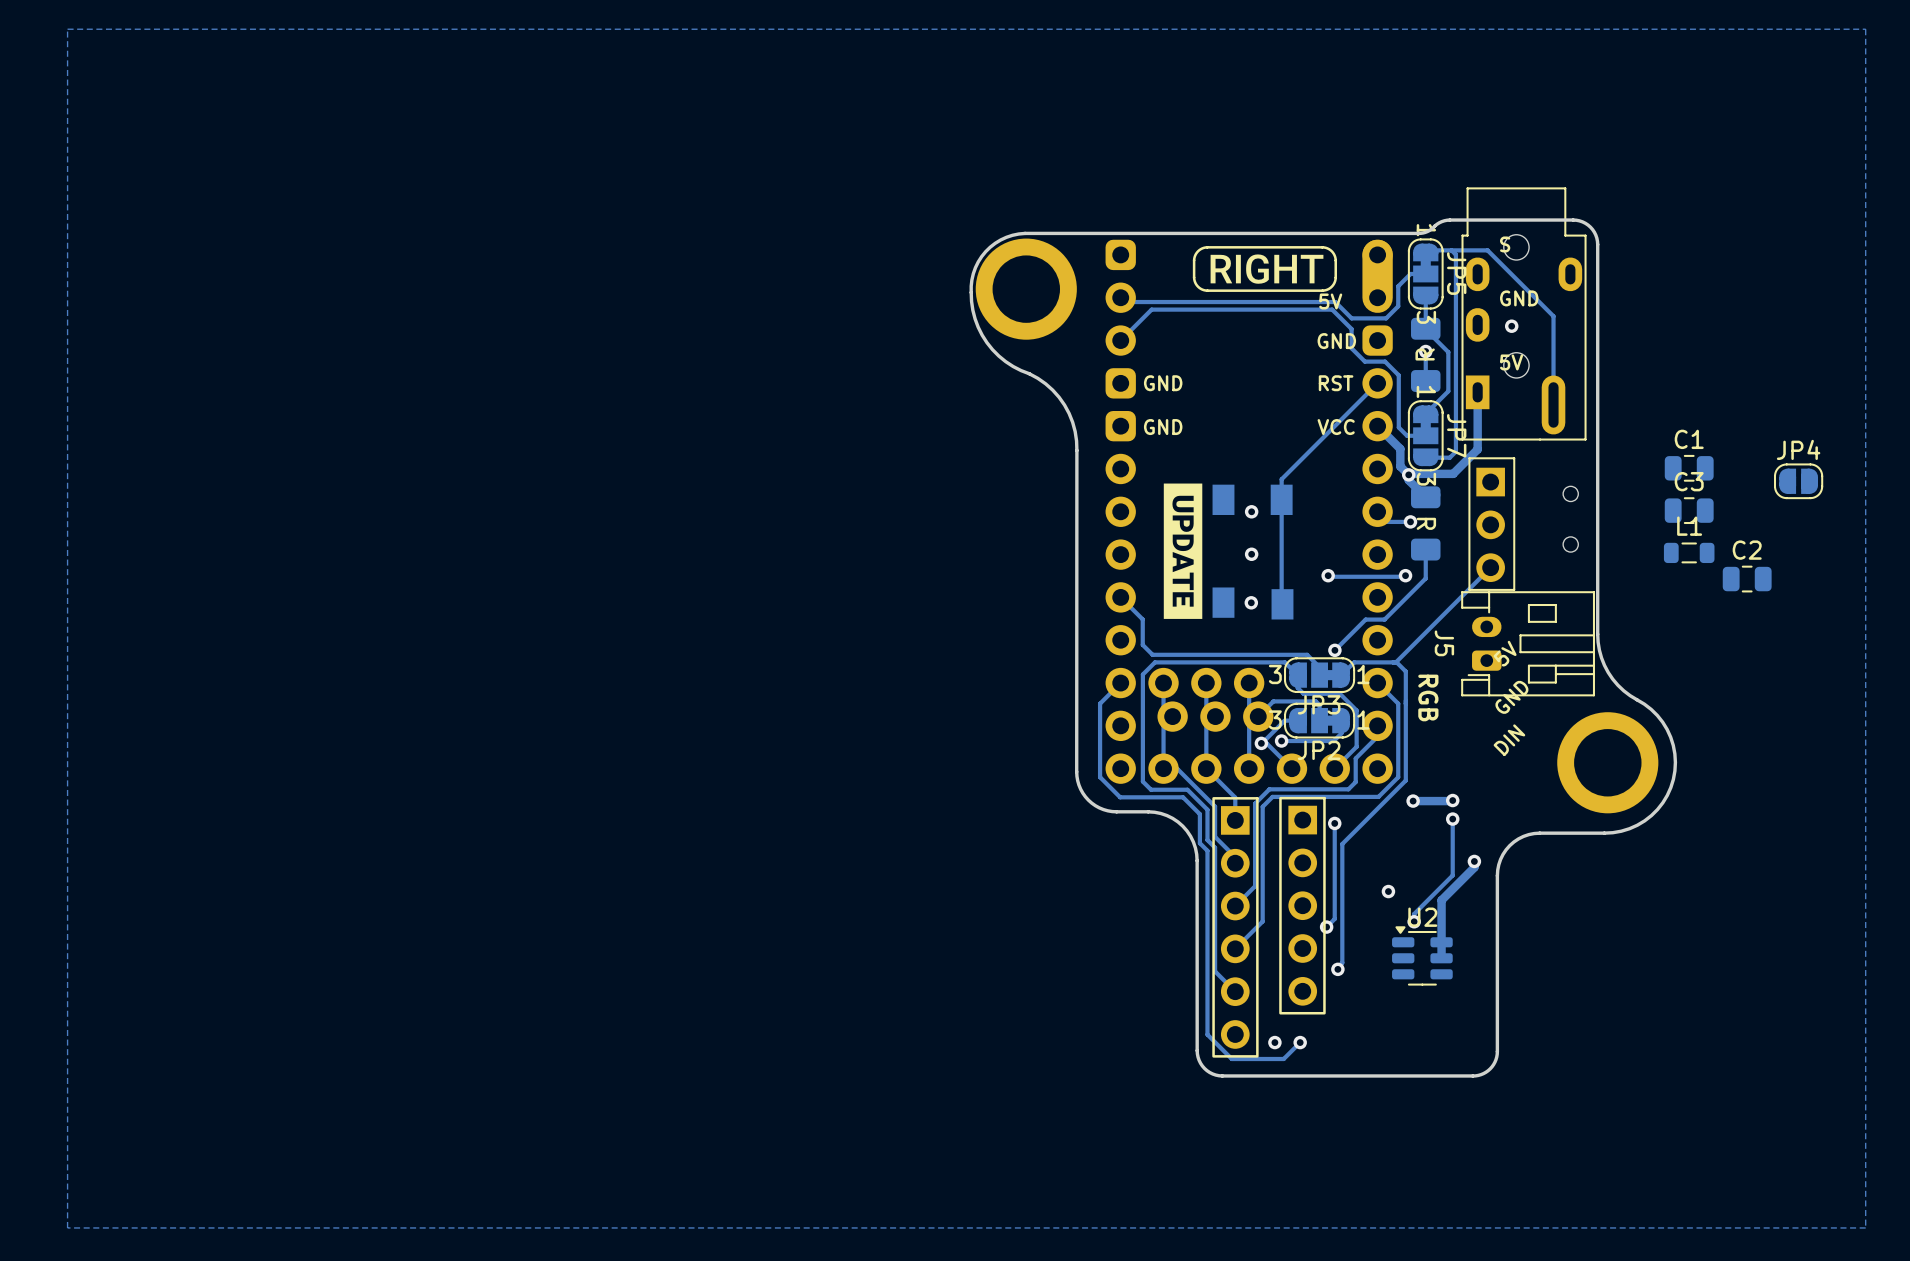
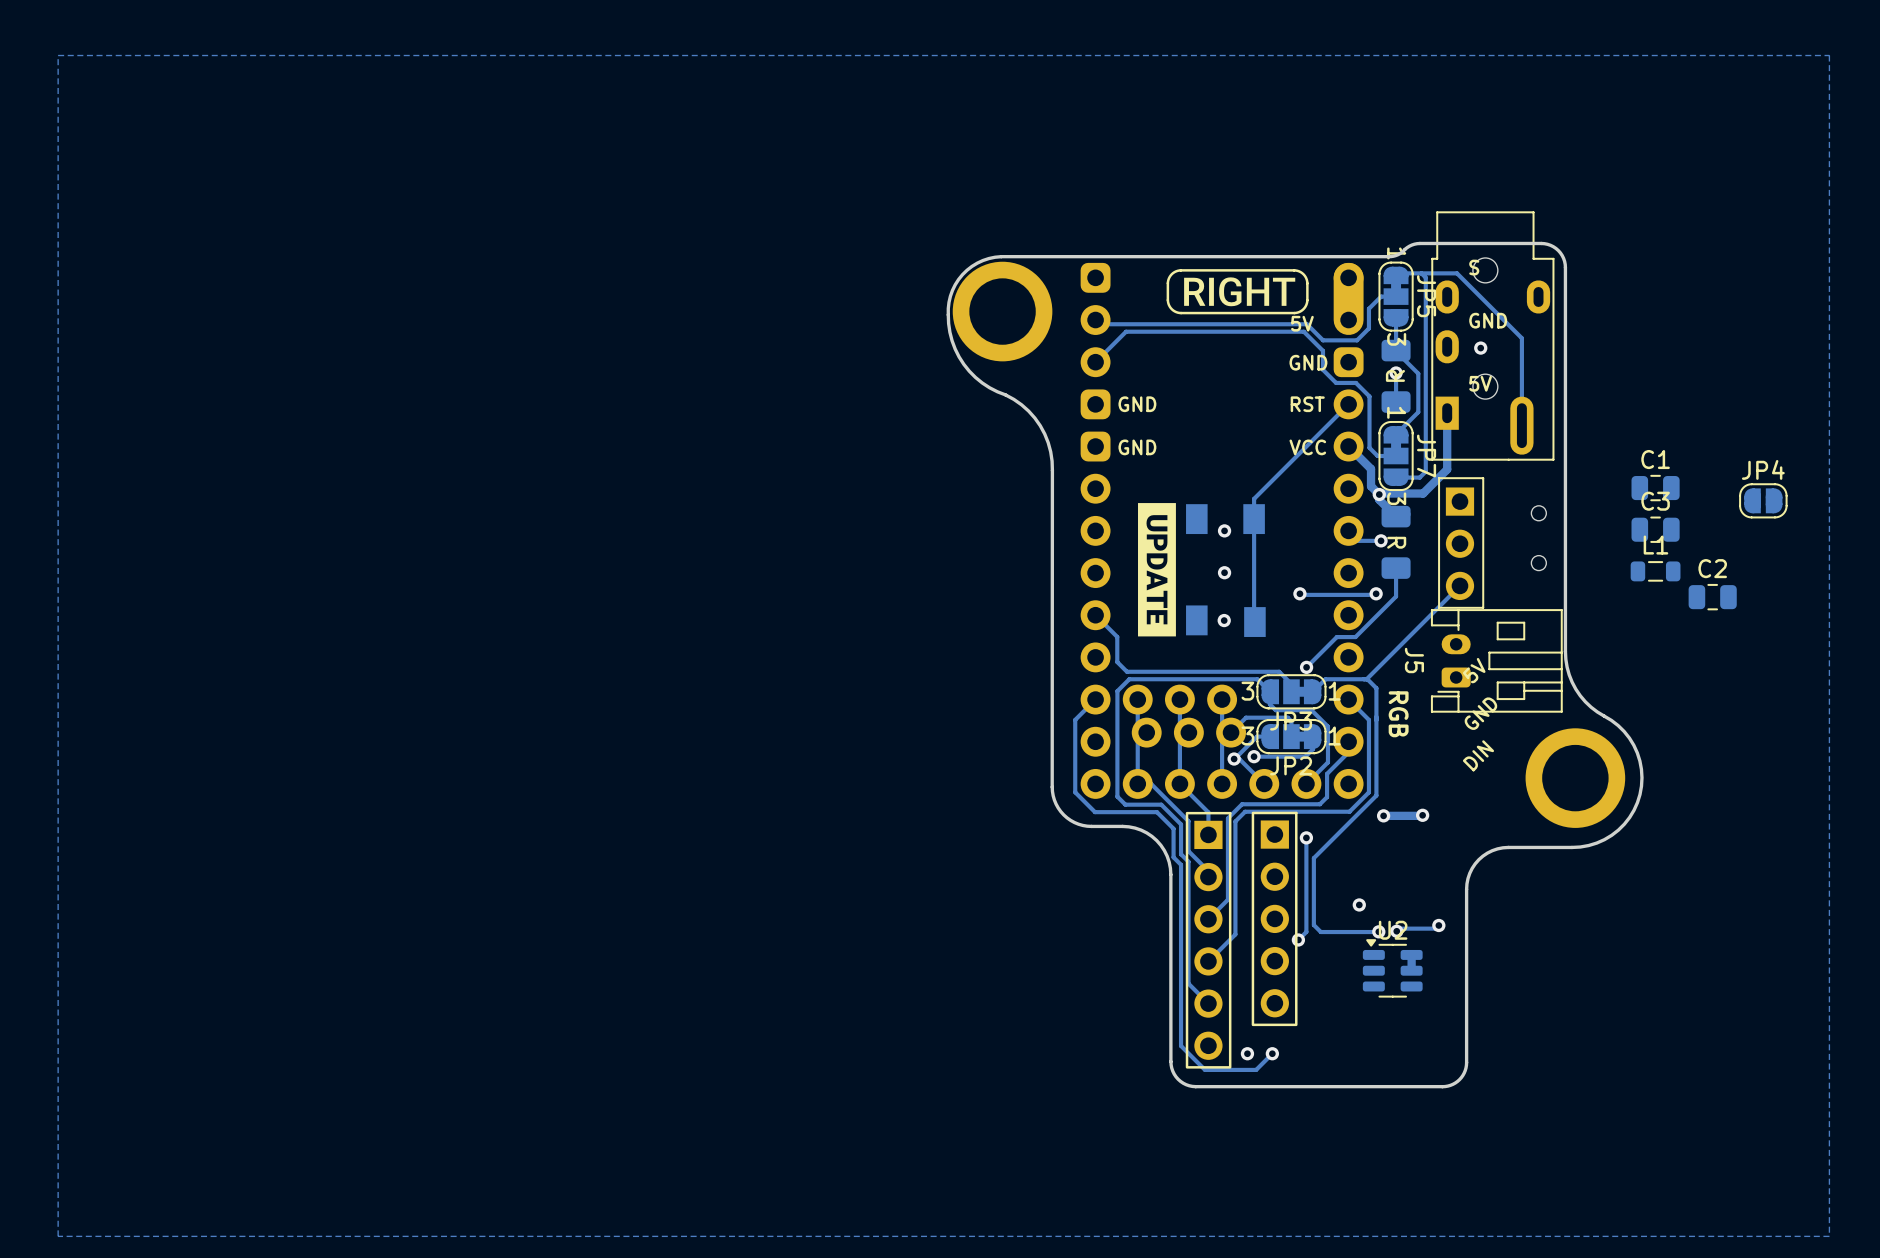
track: (1452, 819) (1452, 875) (1414, 914) (1414, 921) -> none
via: (1452, 819) -> none
track: (1474, 861) (1474, 867) (1441, 900) (1441, 942) -> none
via: (1474, 861) -> none
track: (1342, 911) (1342, 962) (1335, 969) -> (1313, 925) (1320, 932) (1378, 932)
track: none -> (1438, 925) (1435, 928) (1399, 928) (1396, 931)
via: none -> (1438, 925)
via: none -> (1378, 931)
via: none -> (1396, 931)
via: (1414, 921) -> none
via: (1337, 969) -> none

